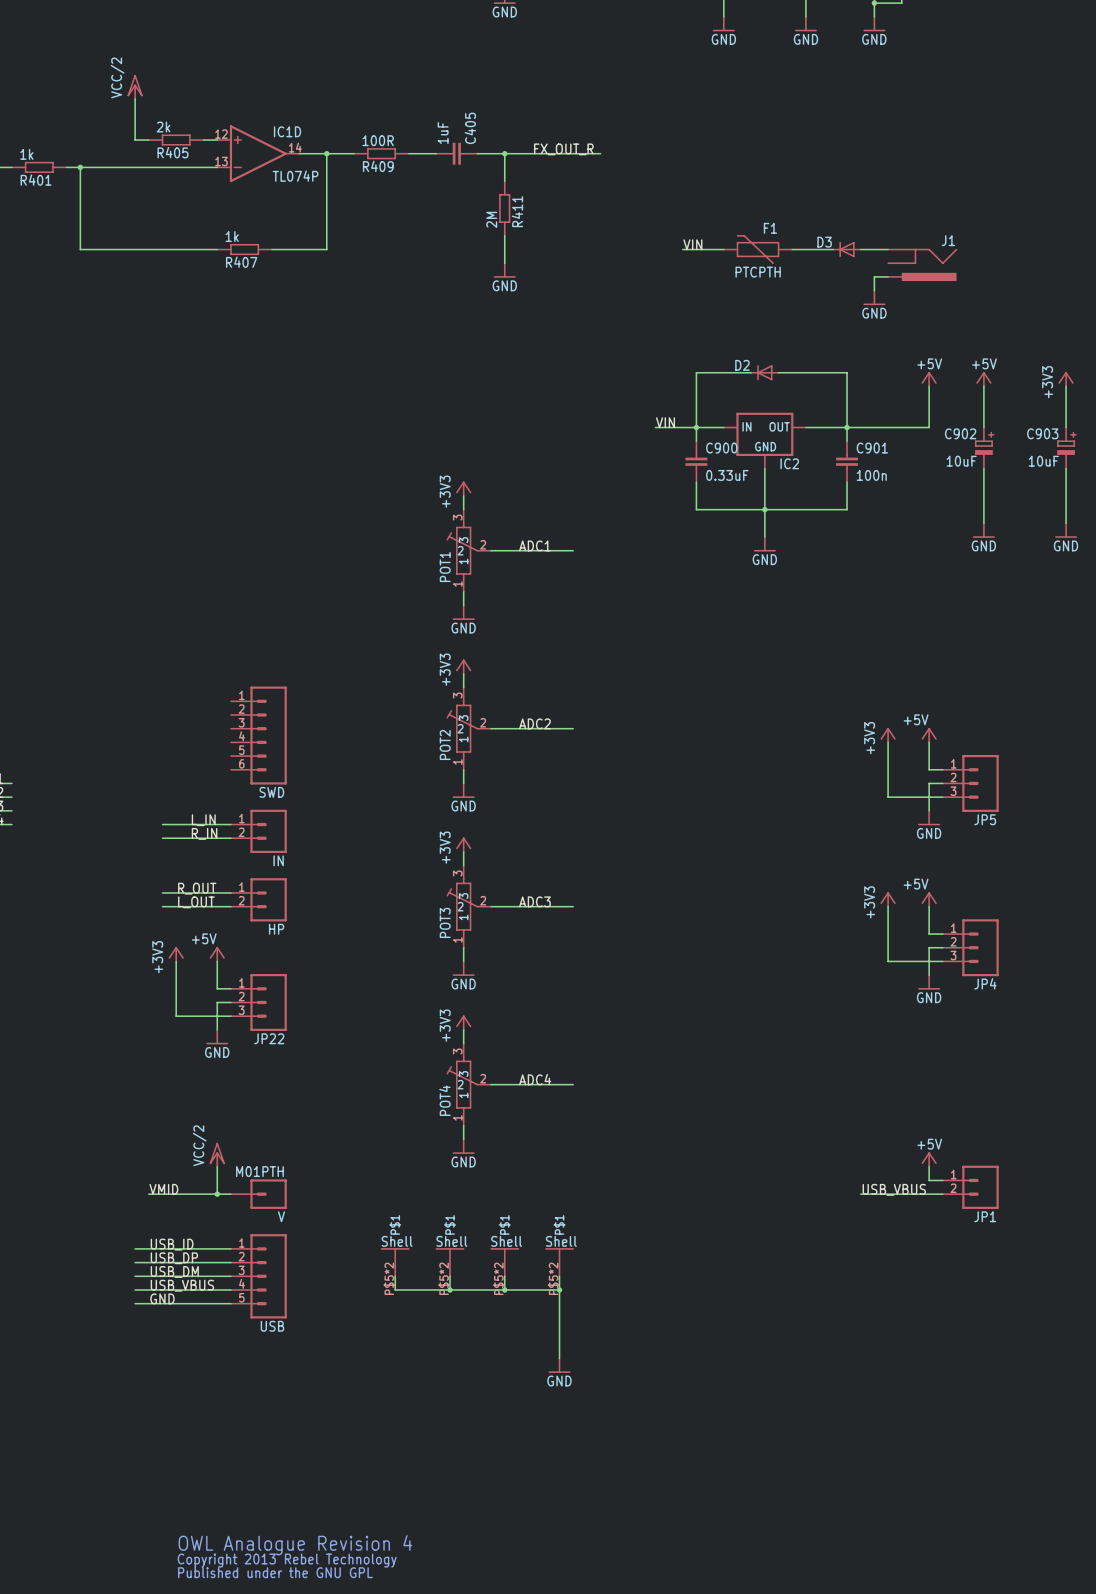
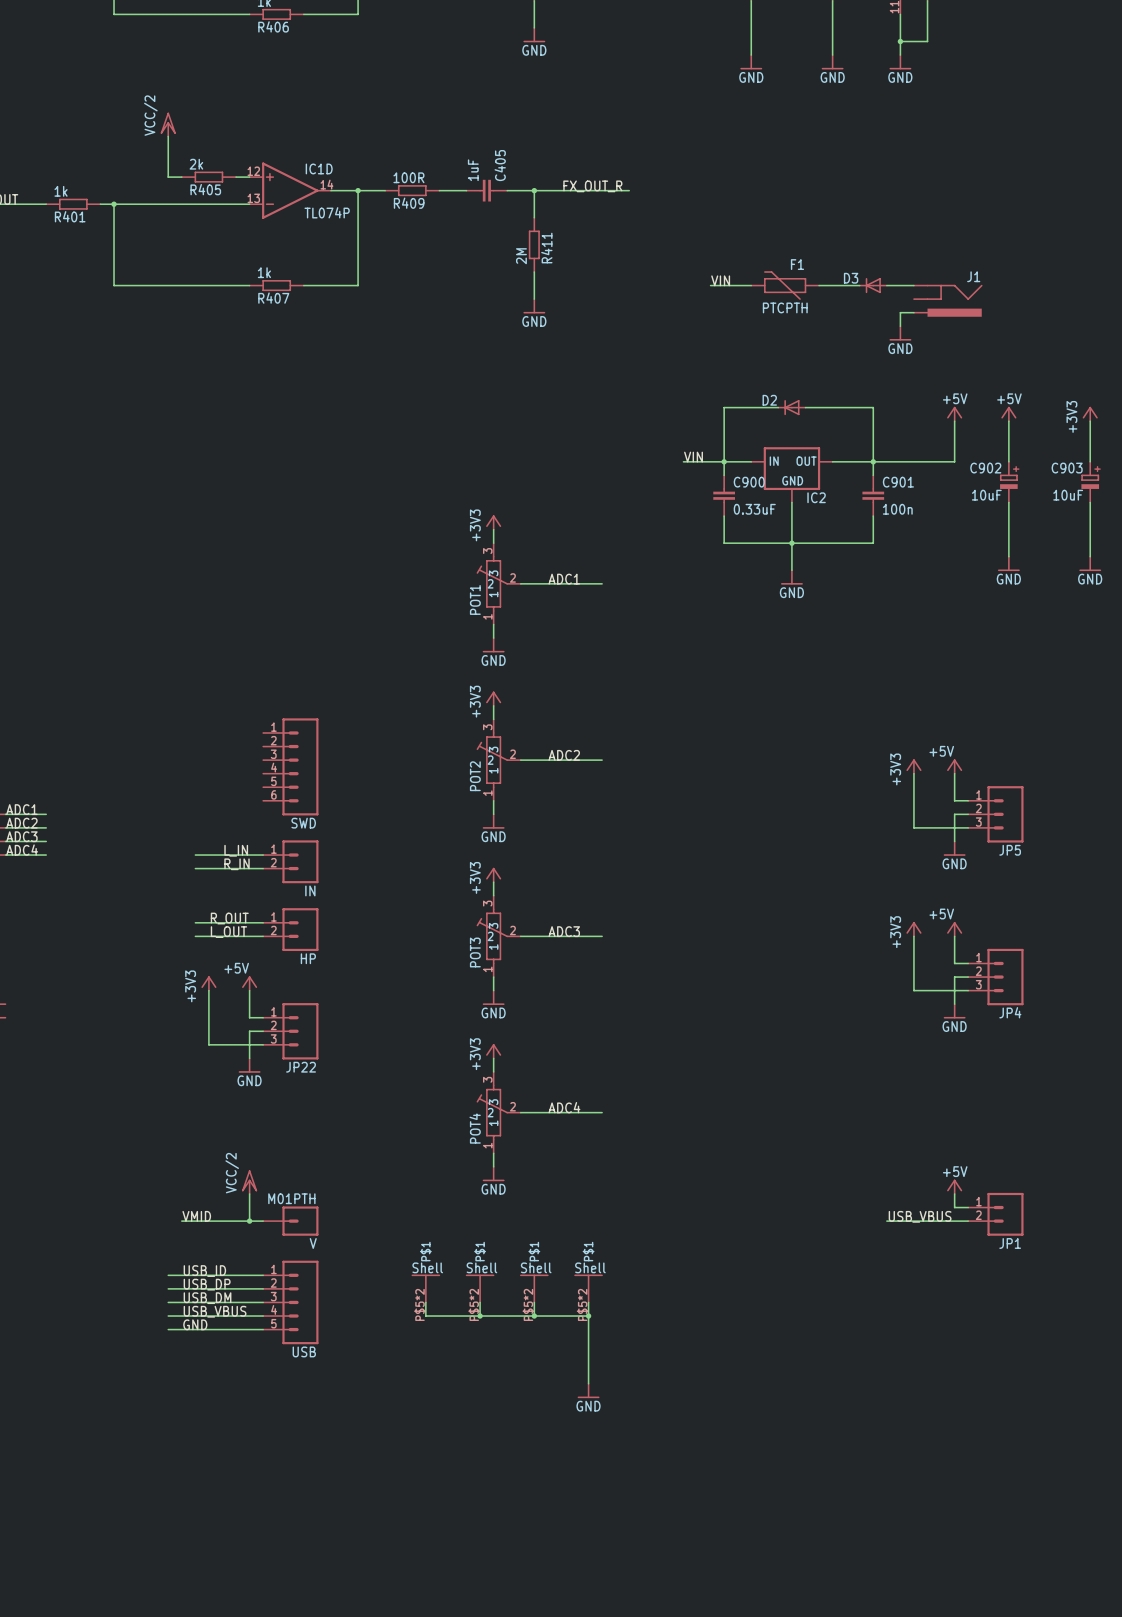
text: OWL Analogue Revision 4 (295, 1545) -> none
text: Copyright 2013 Rebel Technology (287, 1560) -> none
text: Published under the GNU GPL (275, 1572) -> none

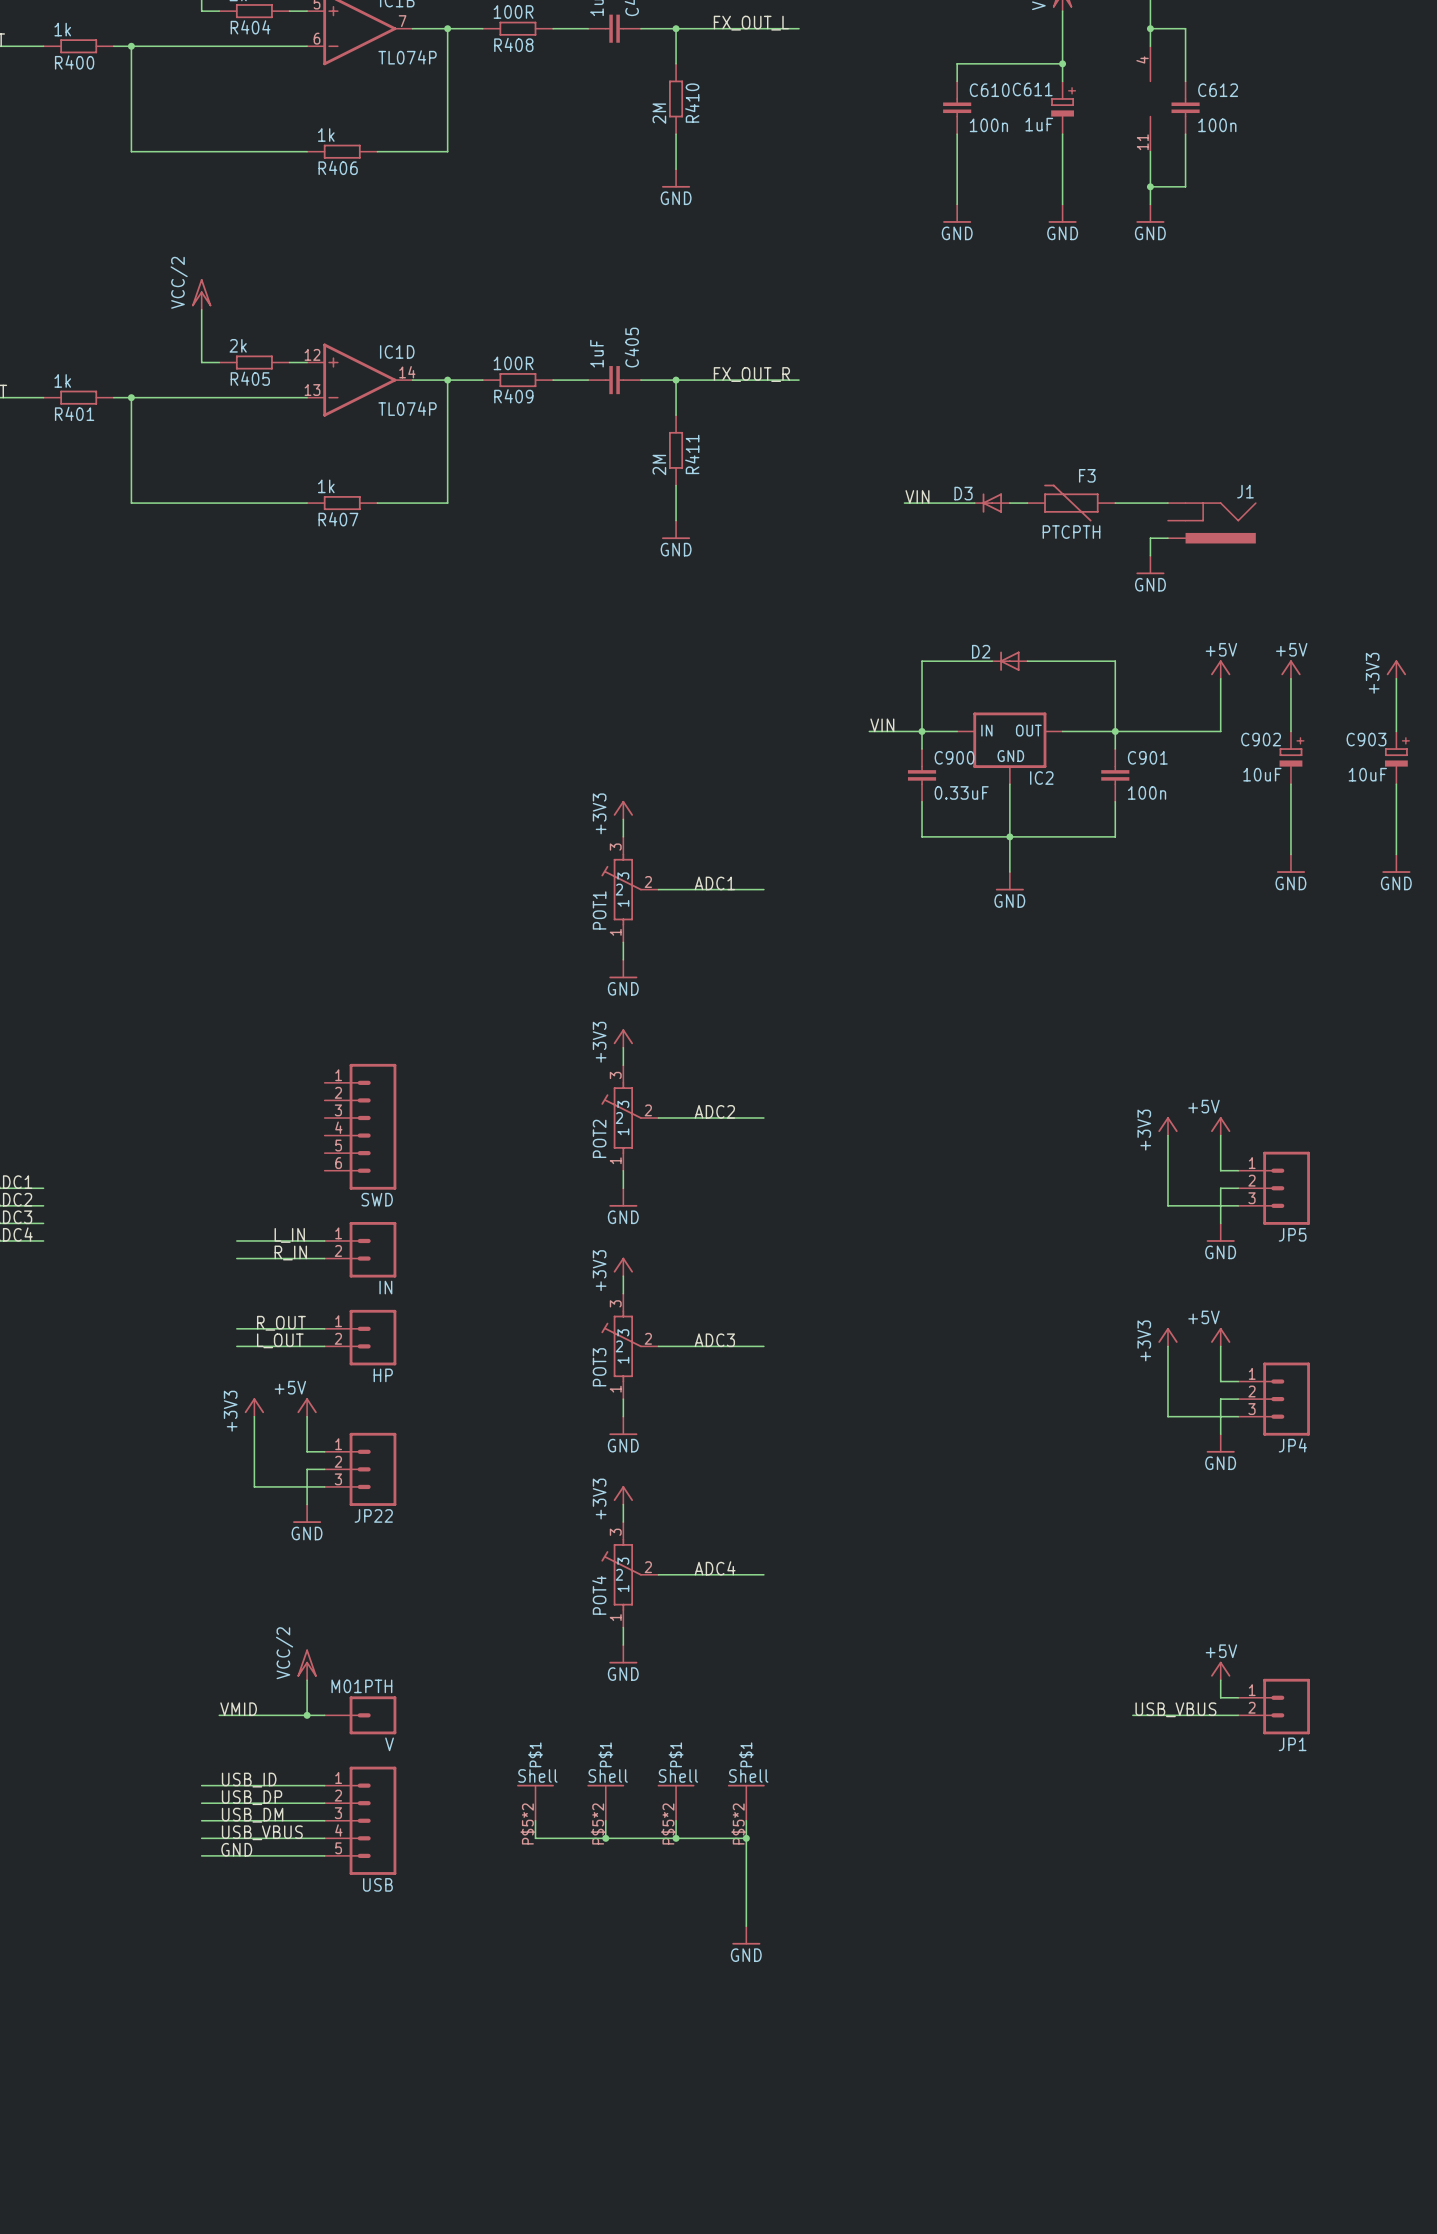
F1: PTCPTH (785, 285) -> none
wire: none -> (1009, 503) (1027, 503)
wire: (819, 285) (859, 285) -> none
F3: none -> PTCPTH (1071, 503)
D3 position: (873, 285) -> (992, 503)

